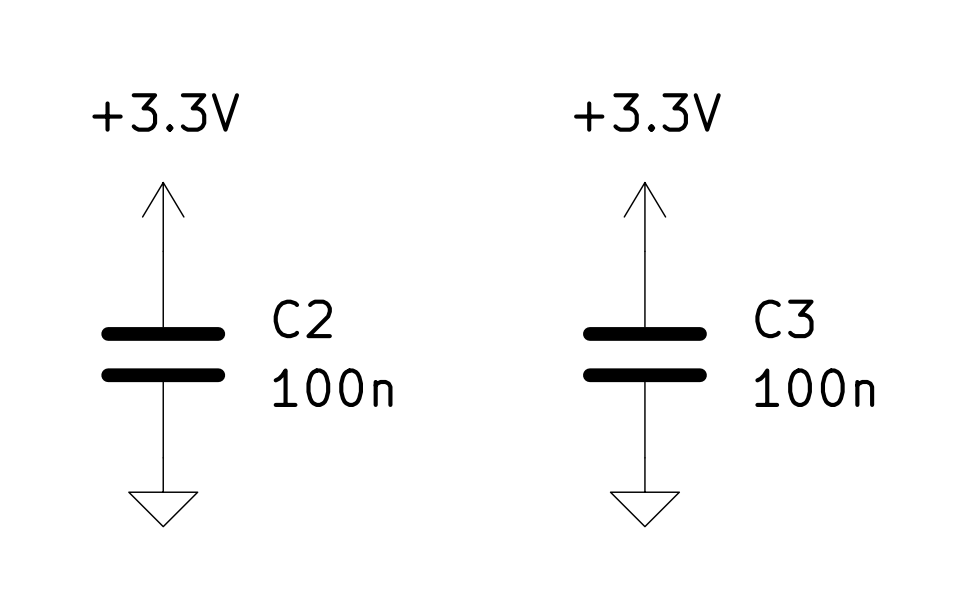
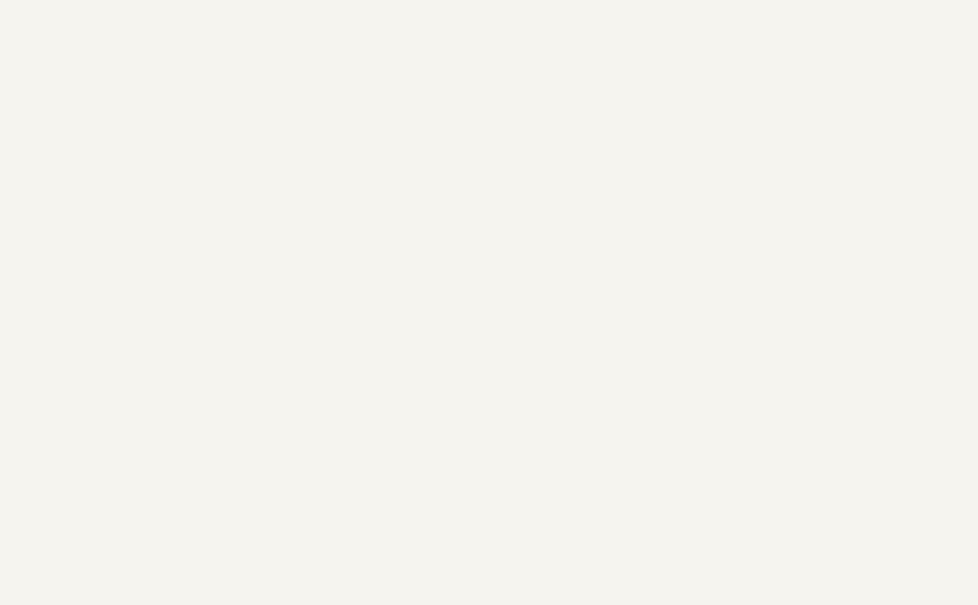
power symbol: +3.3V (163, 216) -> none
power symbol: +3.3V (644, 216) -> none
C2: 100n (163, 354) -> none
C3: 100n (644, 354) -> none
power symbol: (163, 492) -> none
power symbol: (644, 492) -> none

